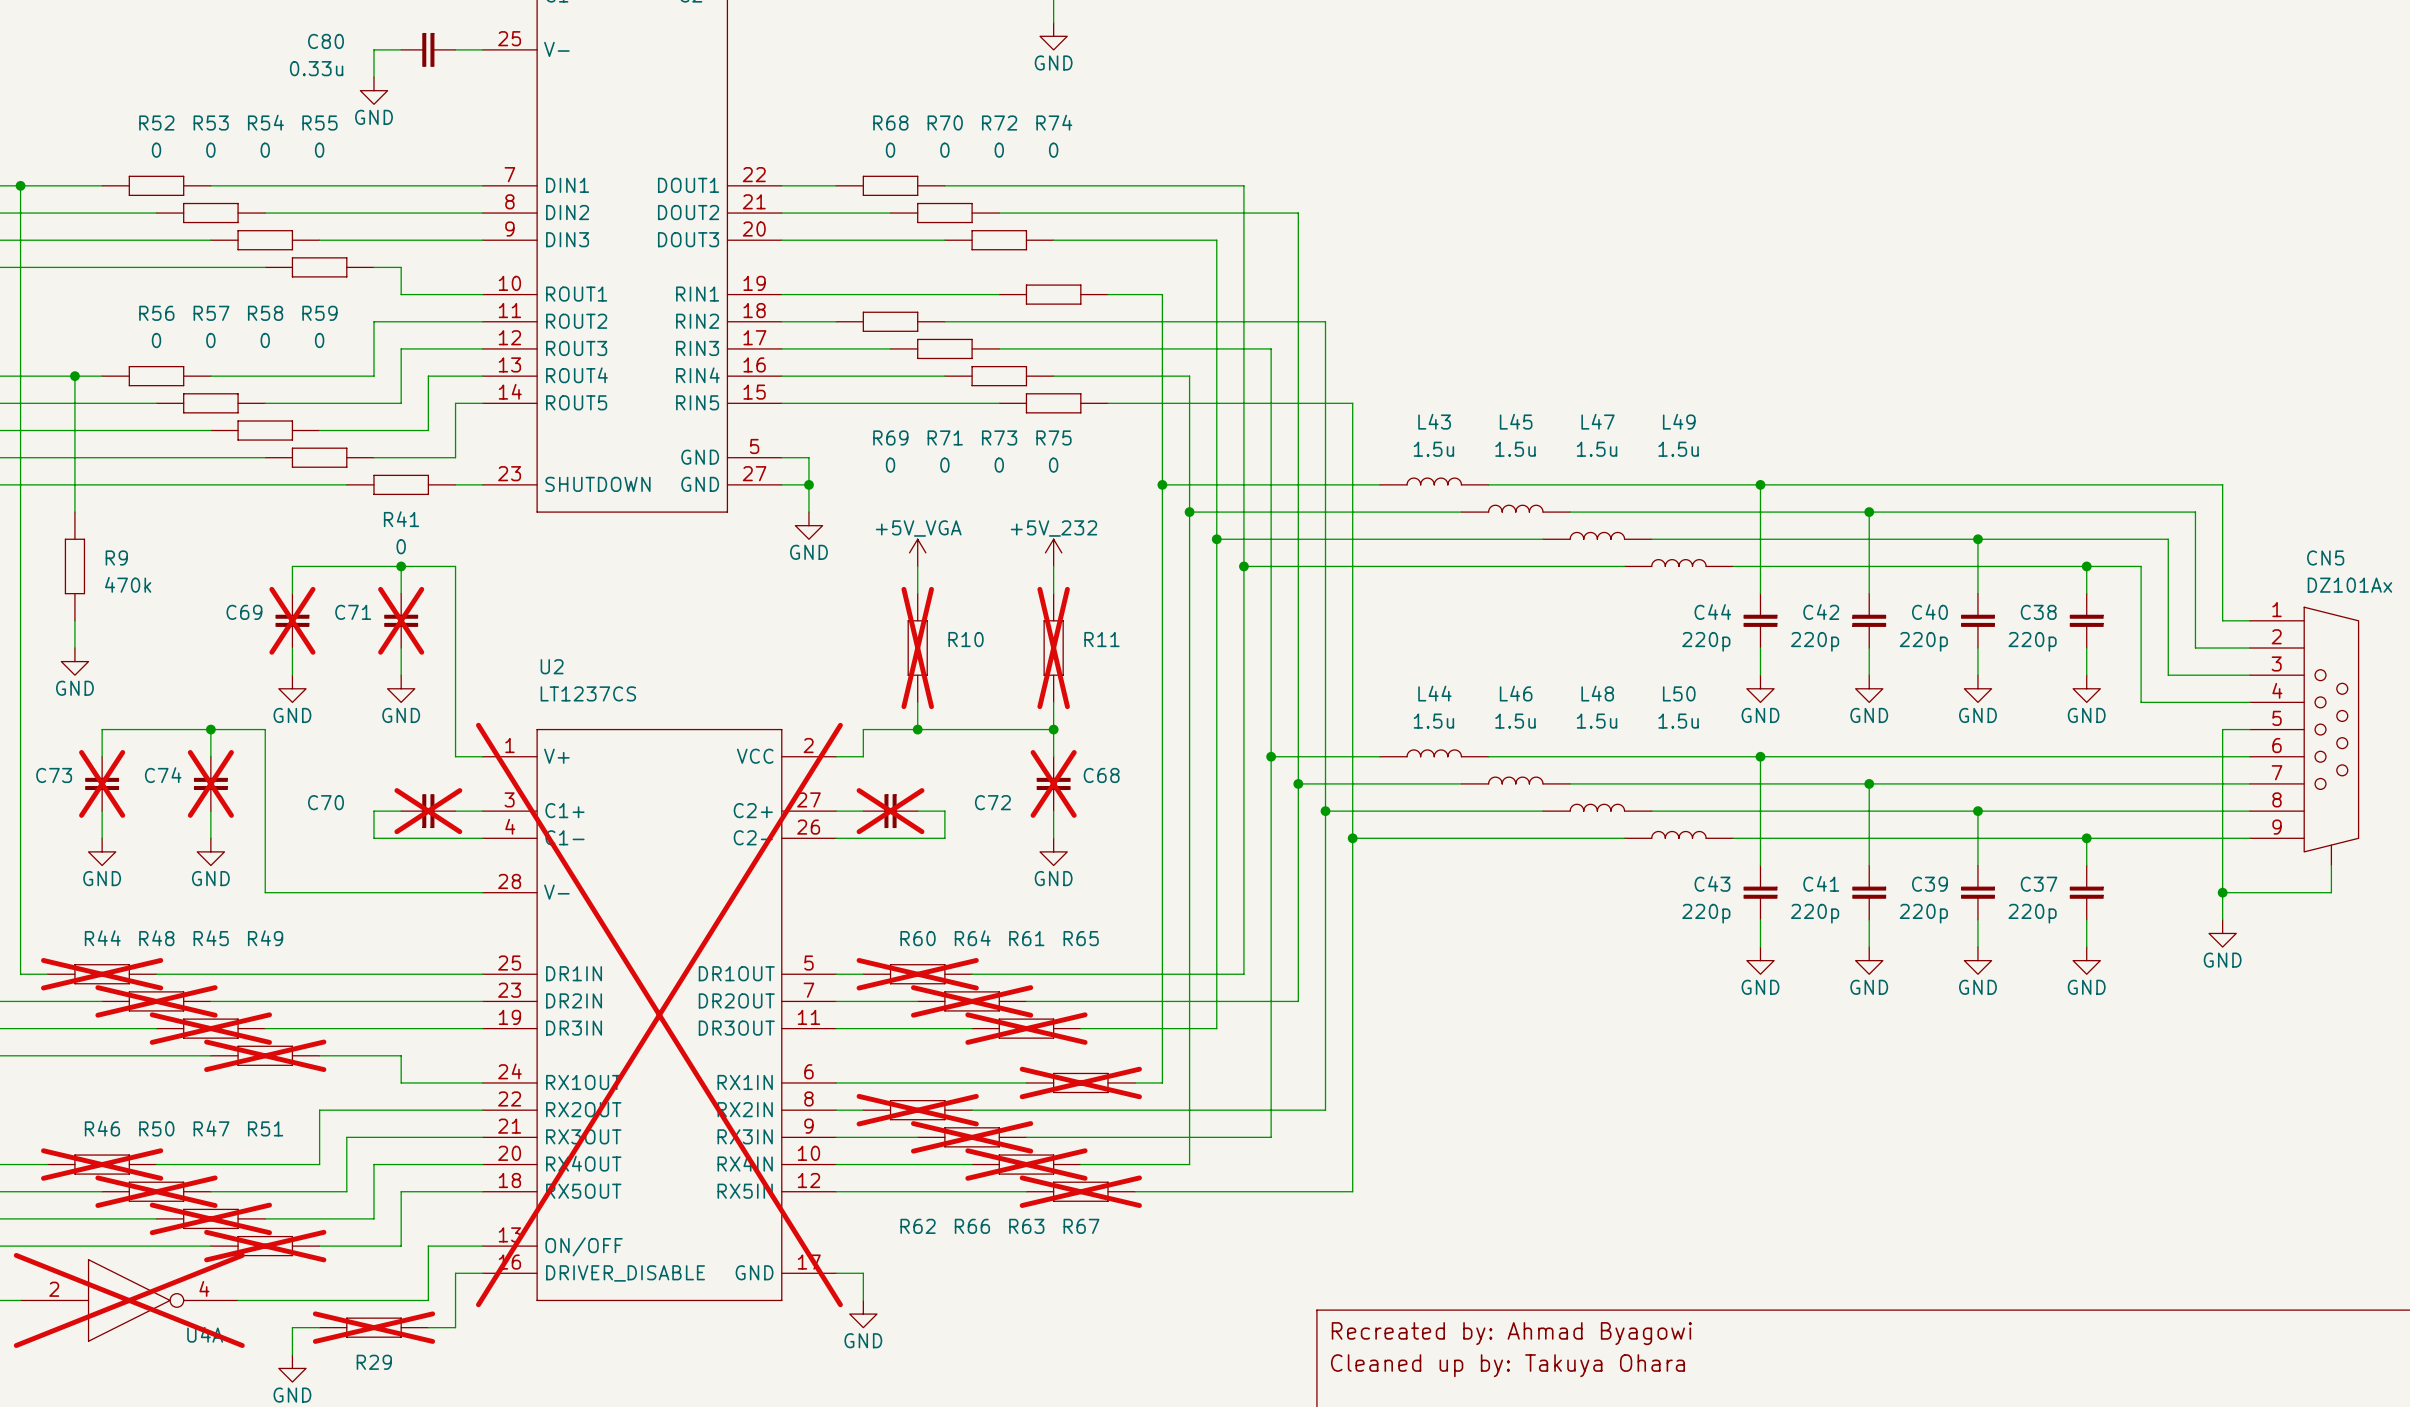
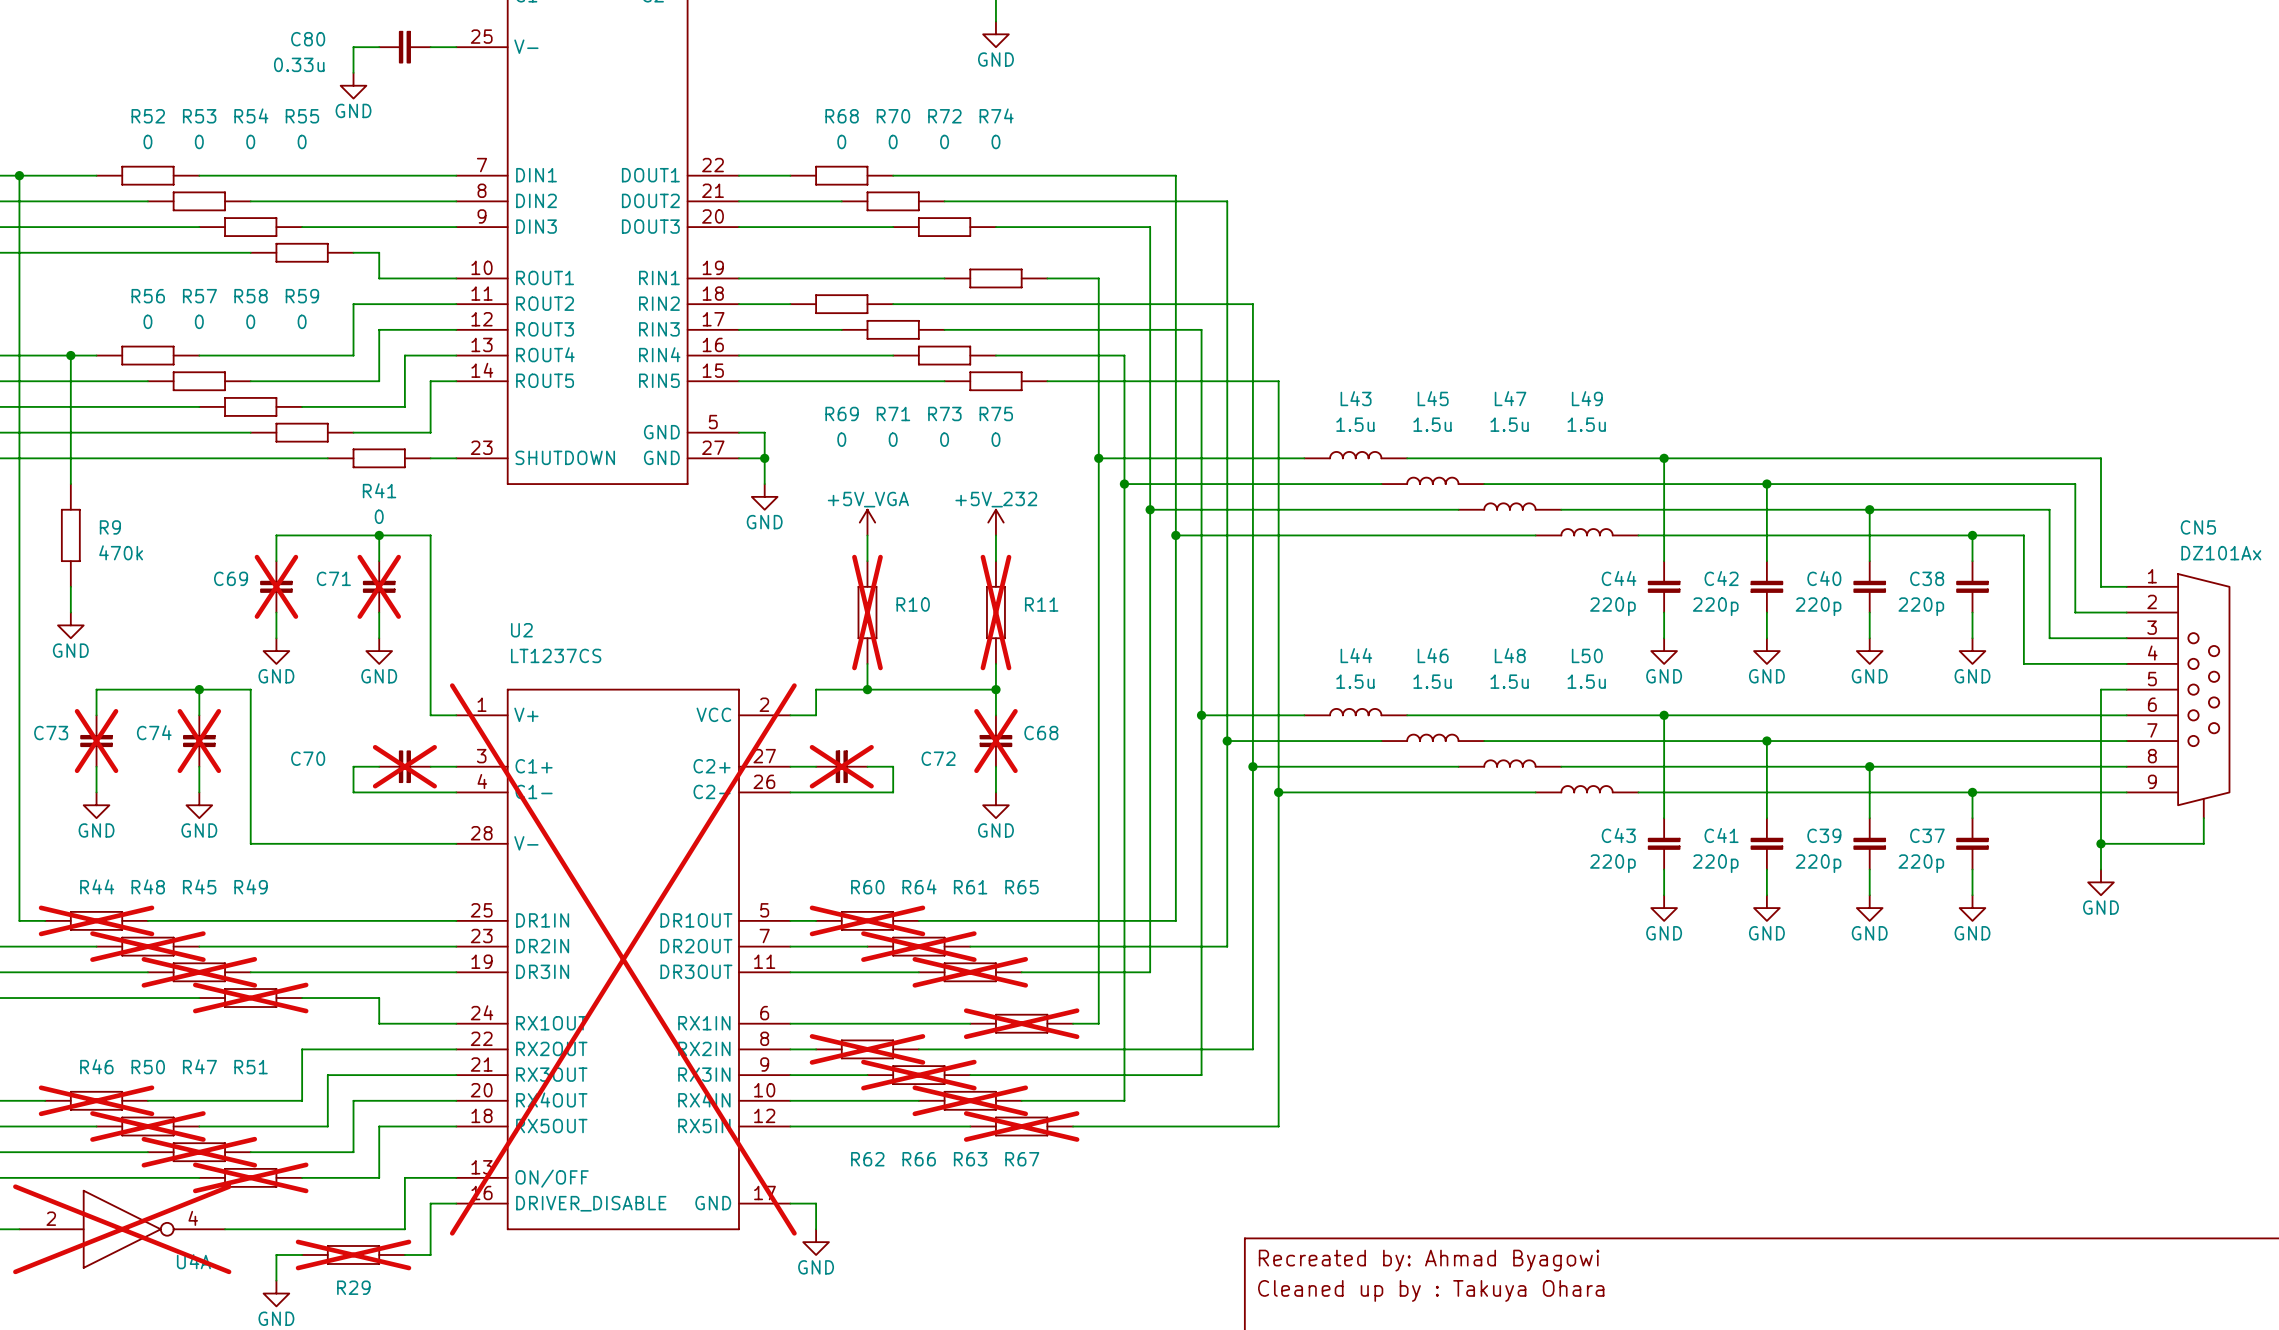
title block: Cleaned up by: Takuya Ohara (1508, 1365) -> Cleaned up by : Takuya Ohara (1431, 1290)

